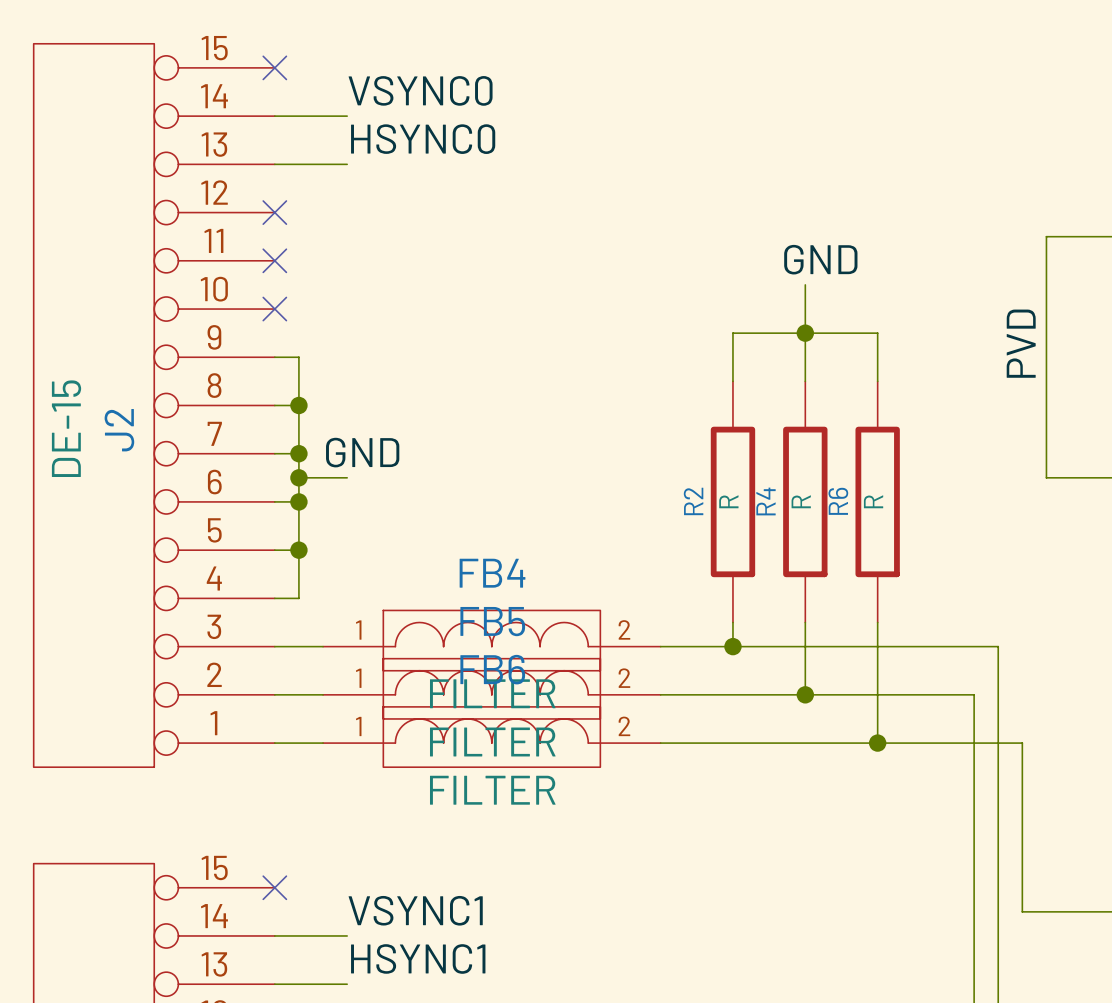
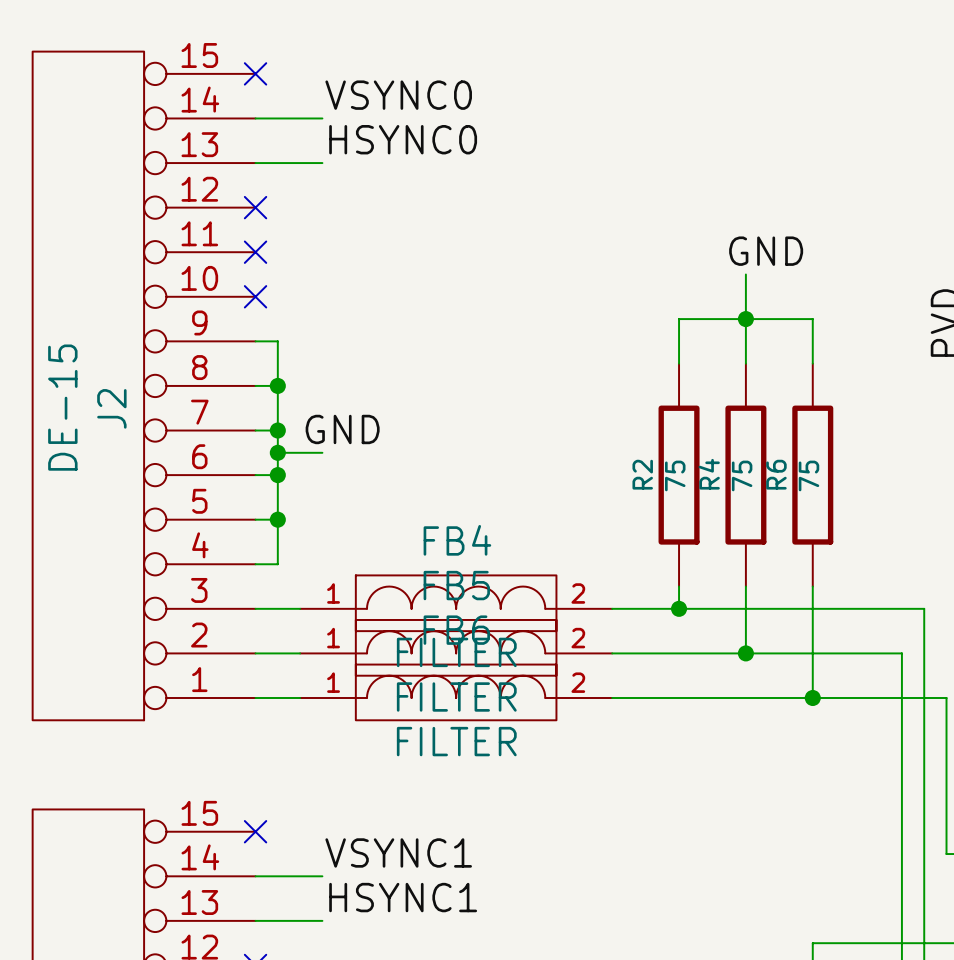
R2 value: R (728, 501) -> 75 (675, 475)
R4 value: R (801, 501) -> 75 (742, 475)
R6 value: R (873, 501) -> 75 (808, 475)

